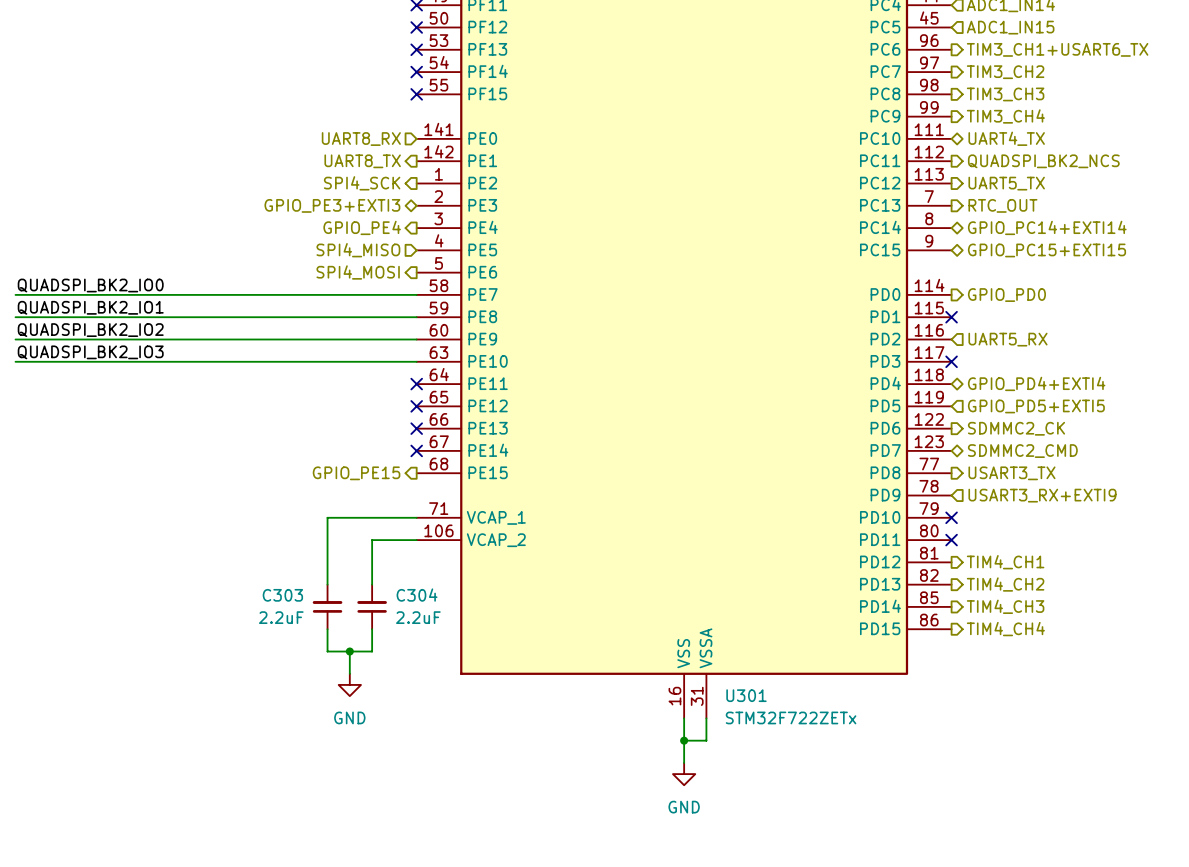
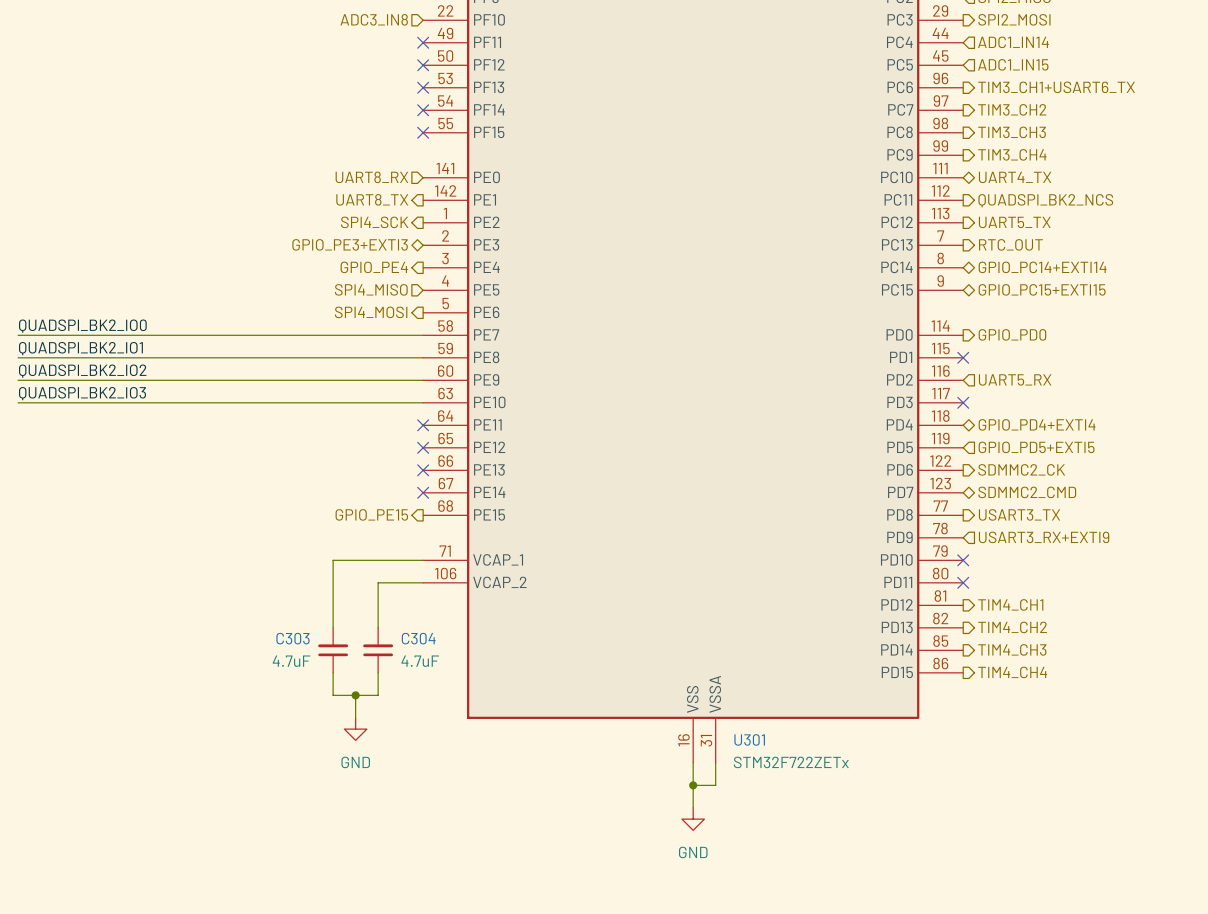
C303 value: 2.2uF (281, 617) -> 4.7uF (291, 661)
C304 value: 2.2uF (418, 617) -> 4.7uF (420, 661)

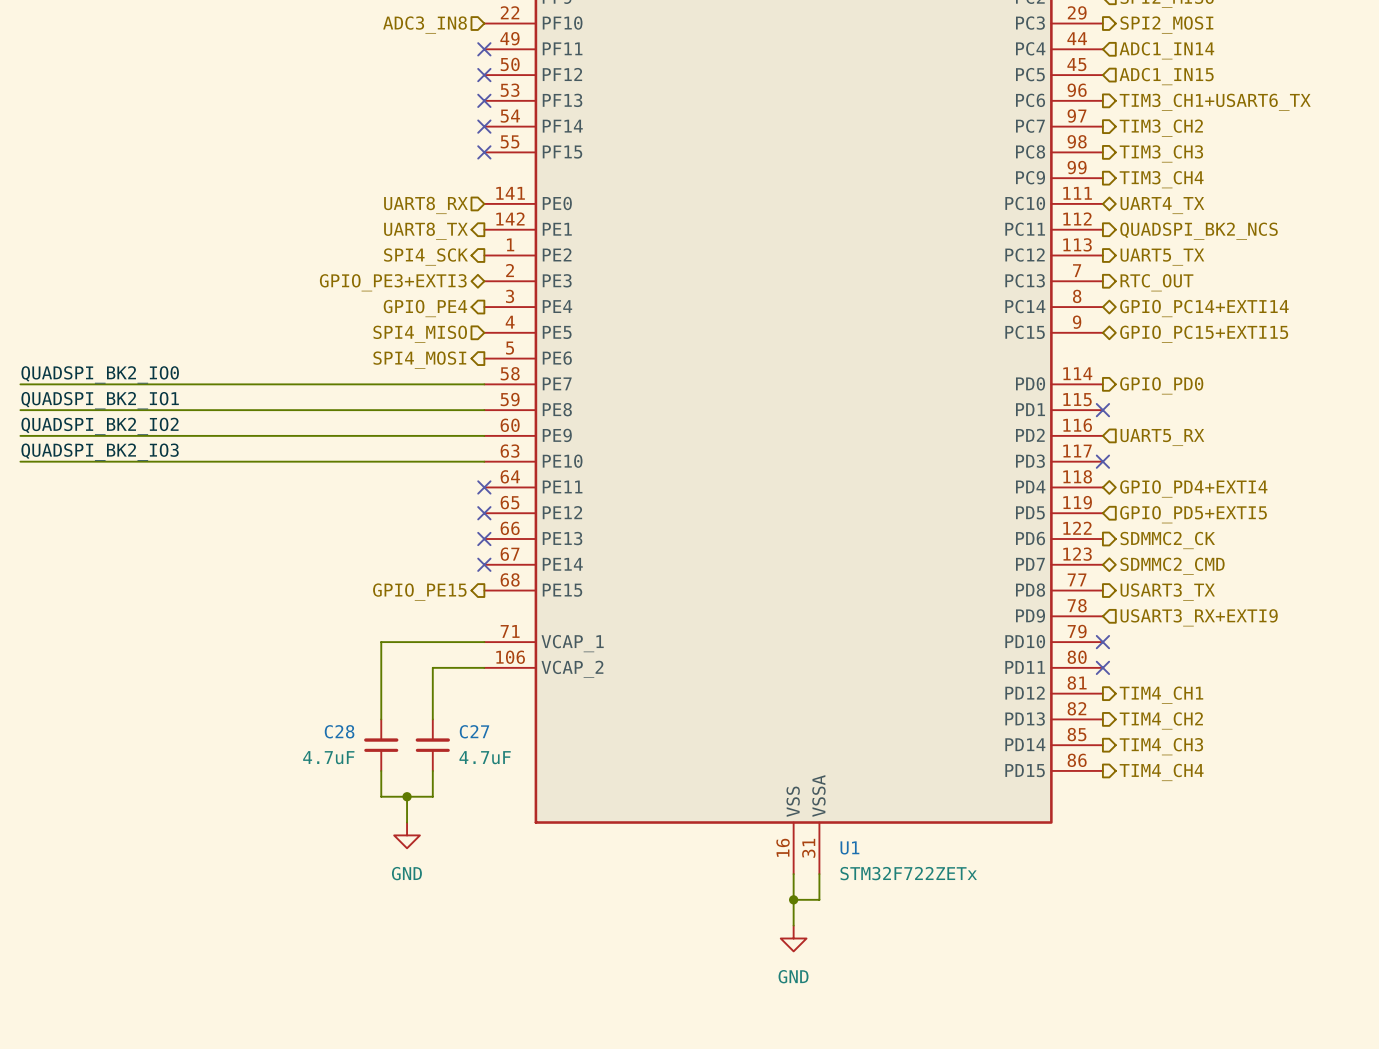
C303 name: C303 (292, 638) -> C28 (339, 731)
C304 name: C304 (418, 638) -> C27 (474, 731)
U301 name: U301 (749, 739) -> U1 (849, 847)

